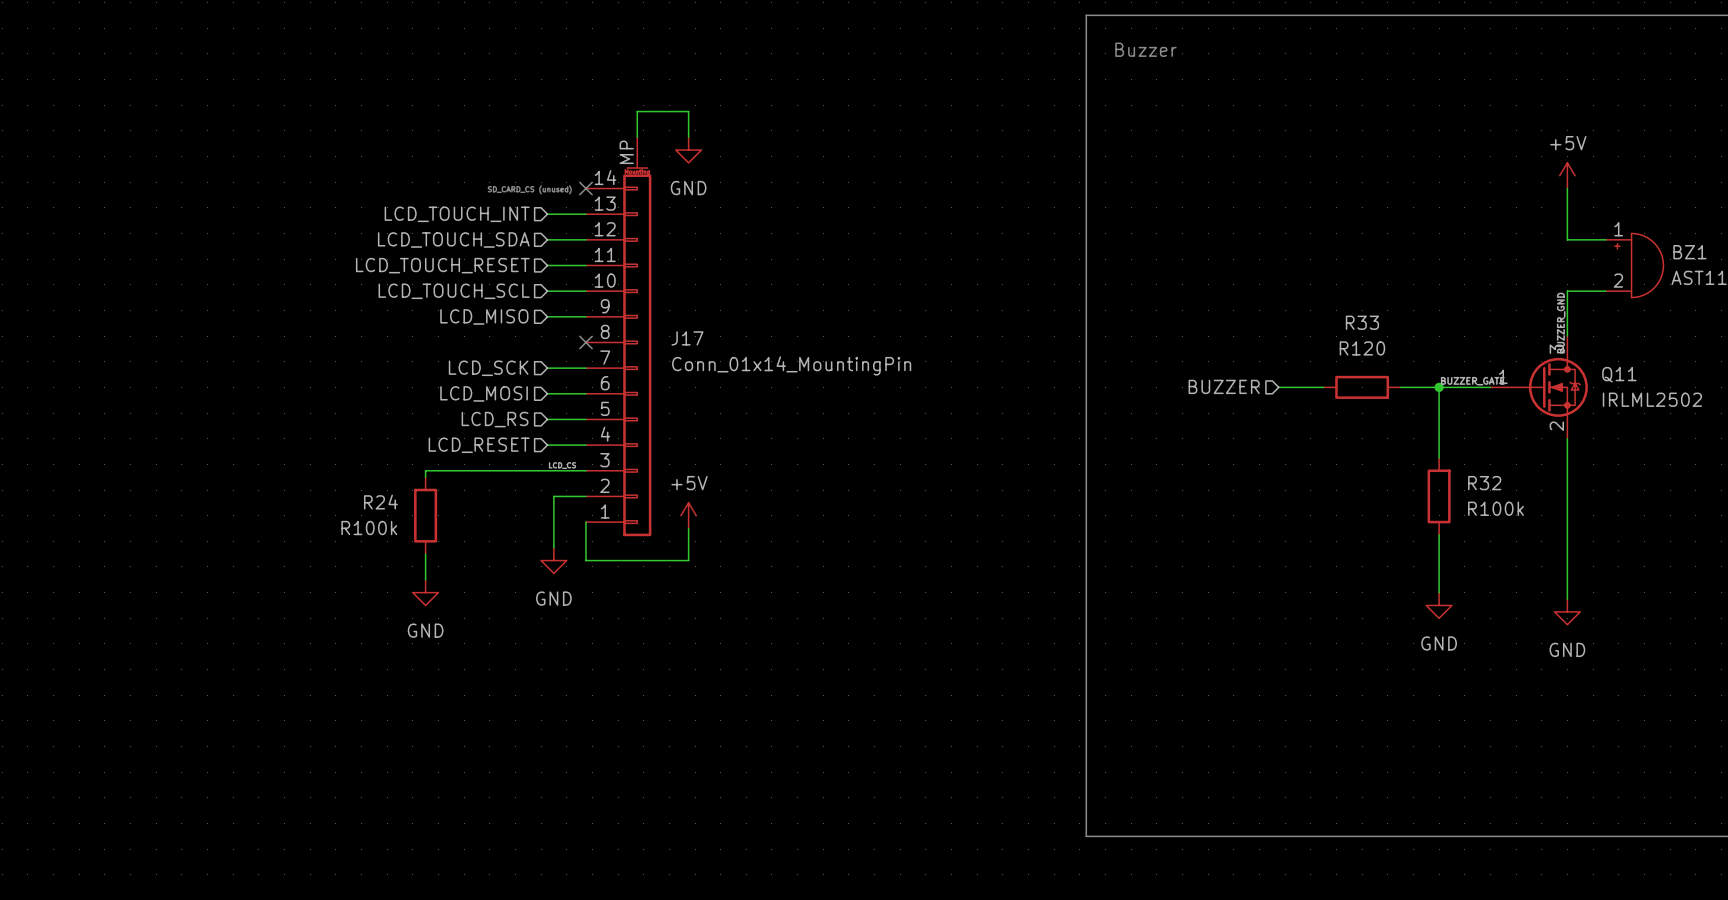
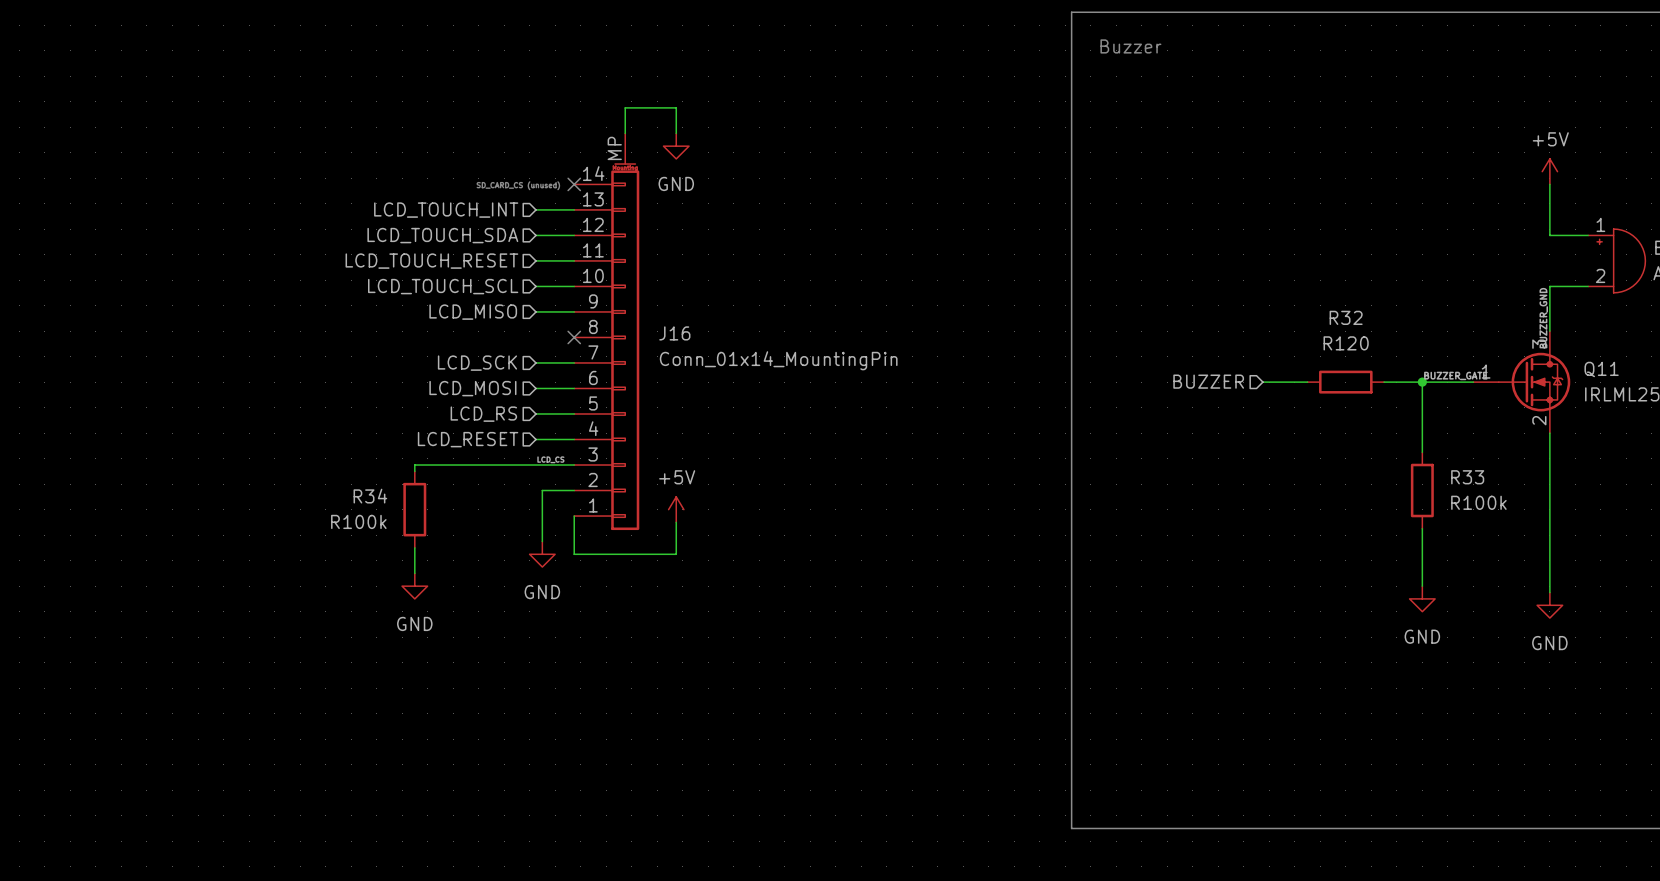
R33 name: R33 (1362, 322) -> R32 (1346, 317)
J17 name: J17 (687, 338) -> J16 (674, 333)
R32 name: R32 (1484, 483) -> R33 (1467, 477)
R24 name: R24 (380, 502) -> R34 (370, 496)

